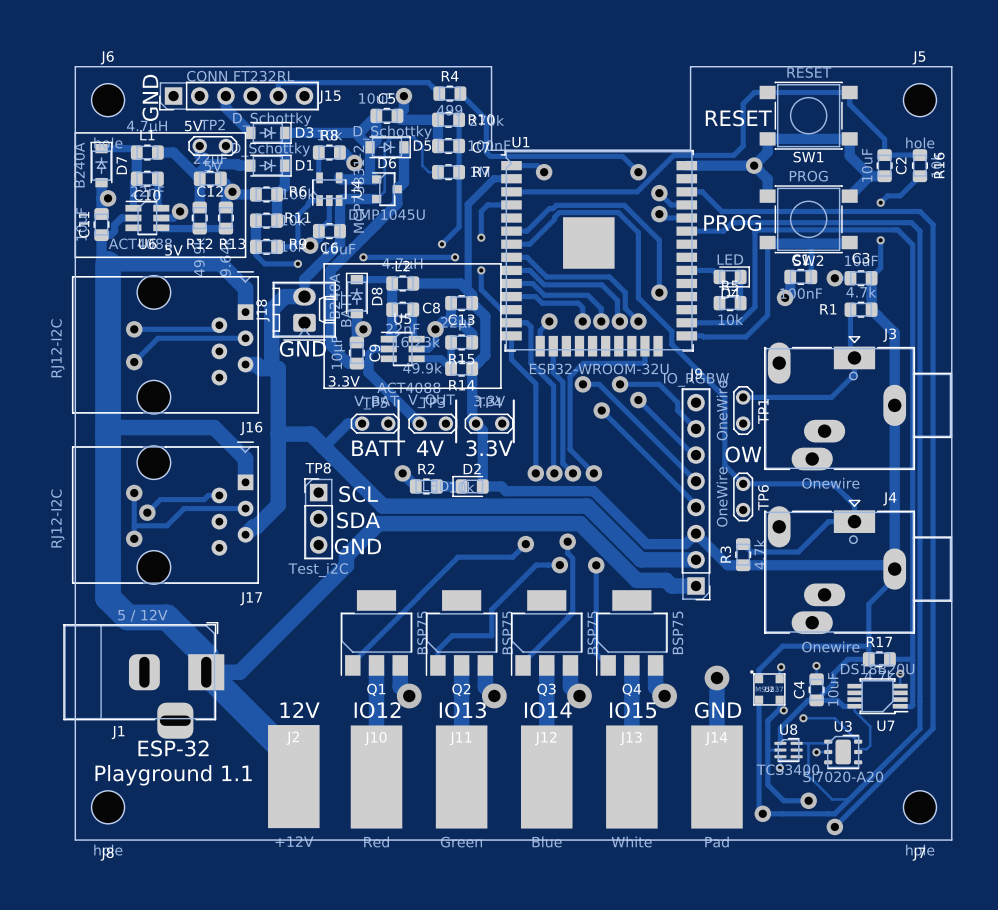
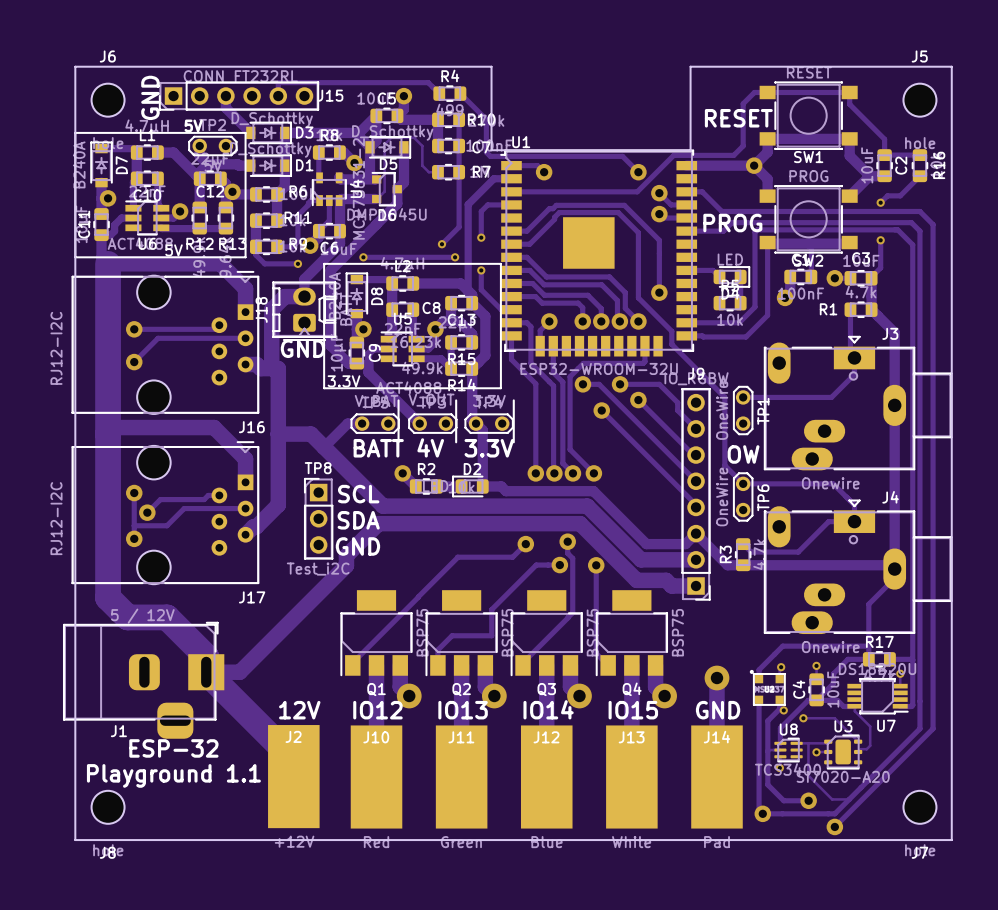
D5 name position: D5 (422, 145) -> D5 (388, 163)
D6 name position: D6 (387, 163) -> D6 (387, 215)

